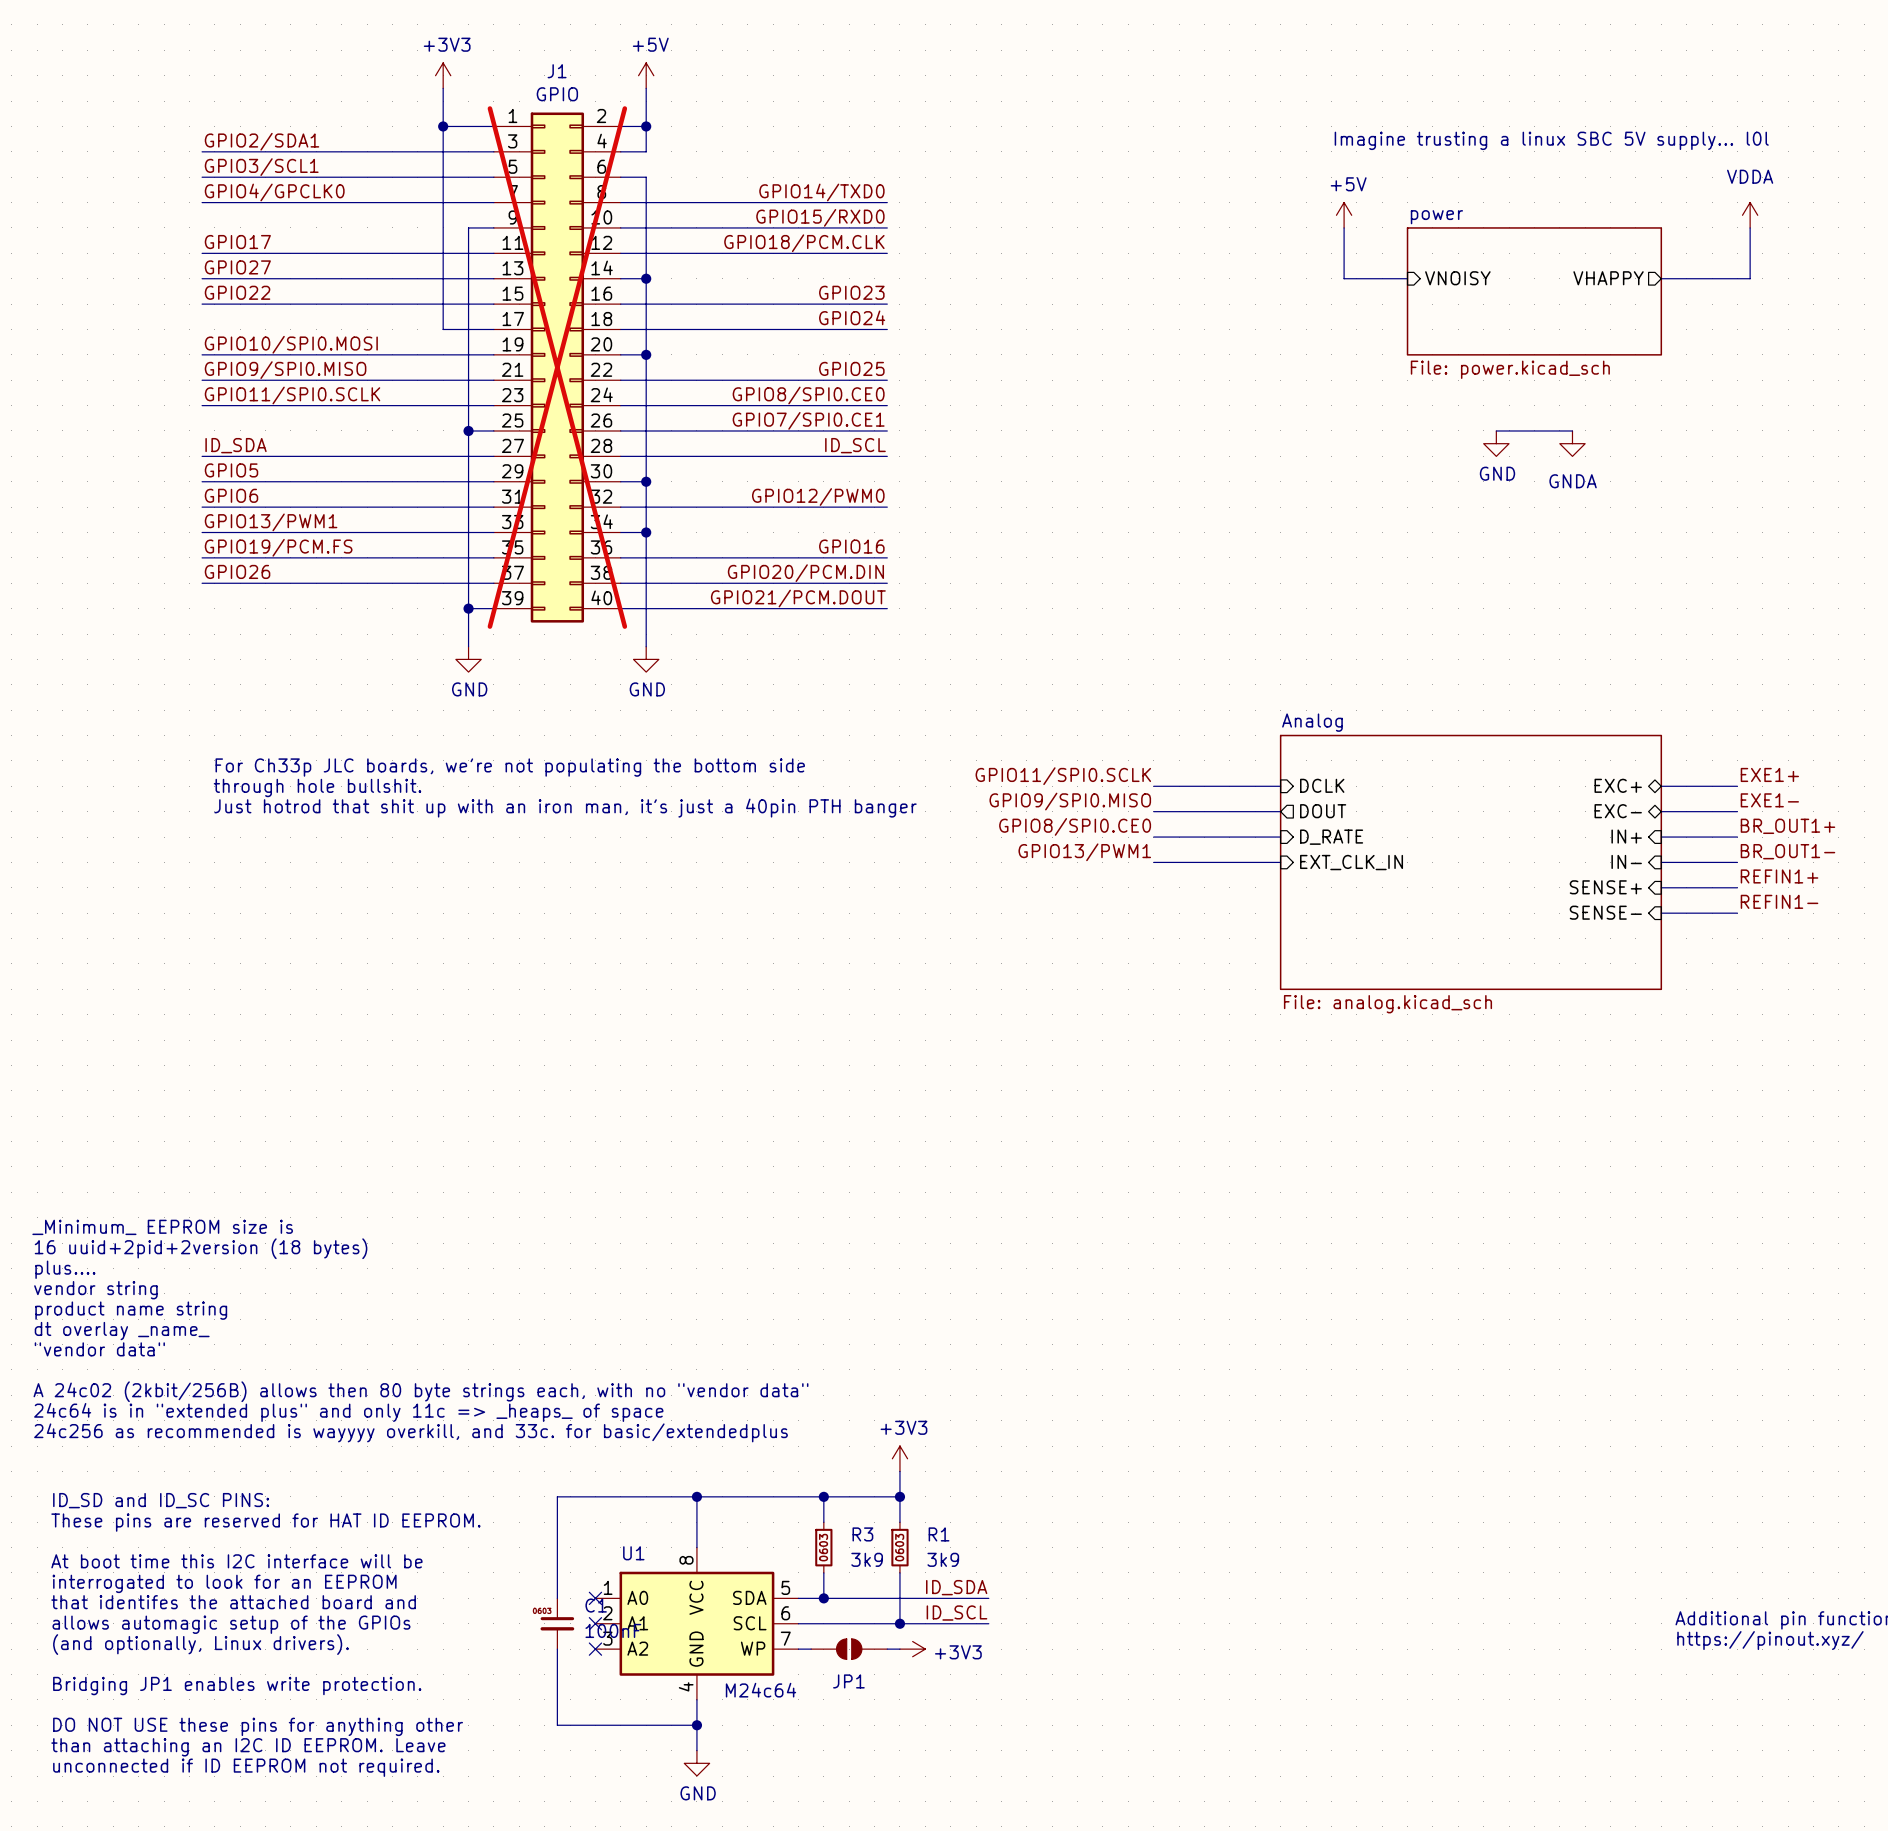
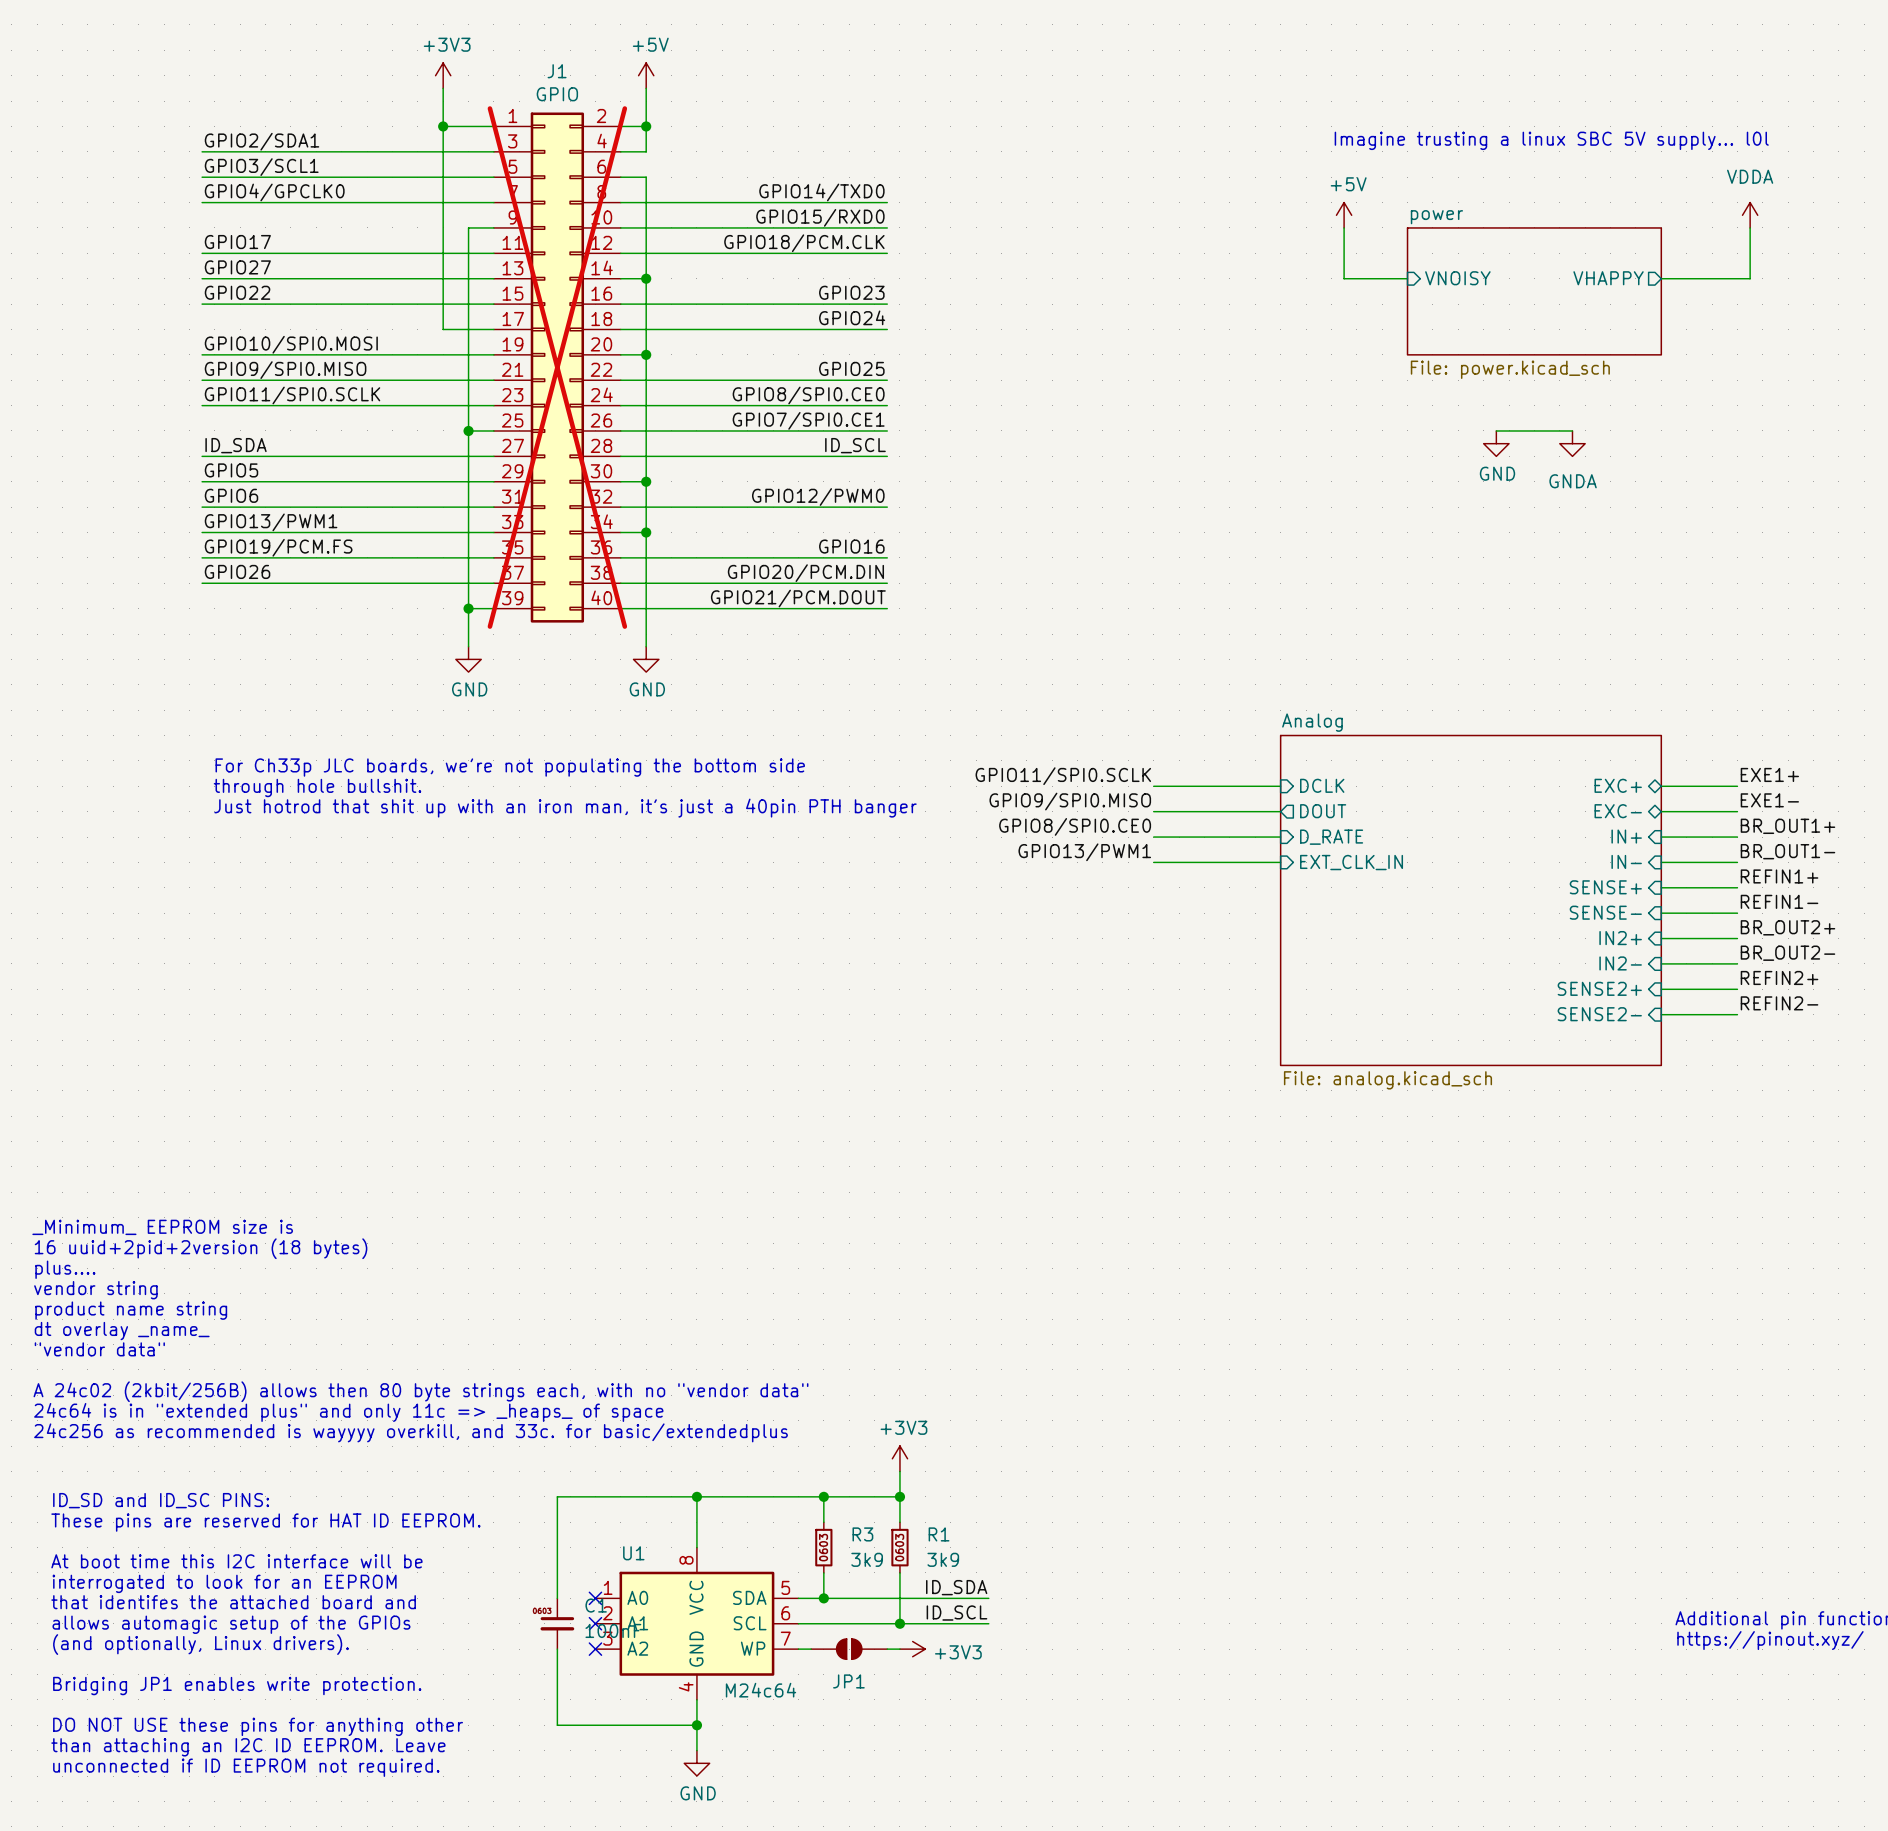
sheet Analog: File: analog.kicad_sch (1470, 862) -> none
sheet Analog: none -> File: analog.kicad_sch (1470, 900)
label: none -> BR_OUT2+ (1787, 927)
sheet pin: none -> IN2+ (1620, 938)
wire: none -> (1661, 938) (1737, 938)
label: none -> BR_OUT2- (1787, 953)
sheet pin: none -> IN2- (1620, 963)
wire: none -> (1661, 963) (1737, 963)
label: none -> REFIN2+ (1779, 977)
sheet pin: none -> SENSE2+ (1599, 988)
wire: none -> (1661, 989) (1737, 989)
label: none -> REFIN2- (1779, 1003)
sheet pin: none -> SENSE2- (1599, 1014)
wire: none -> (1661, 1014) (1737, 1014)

